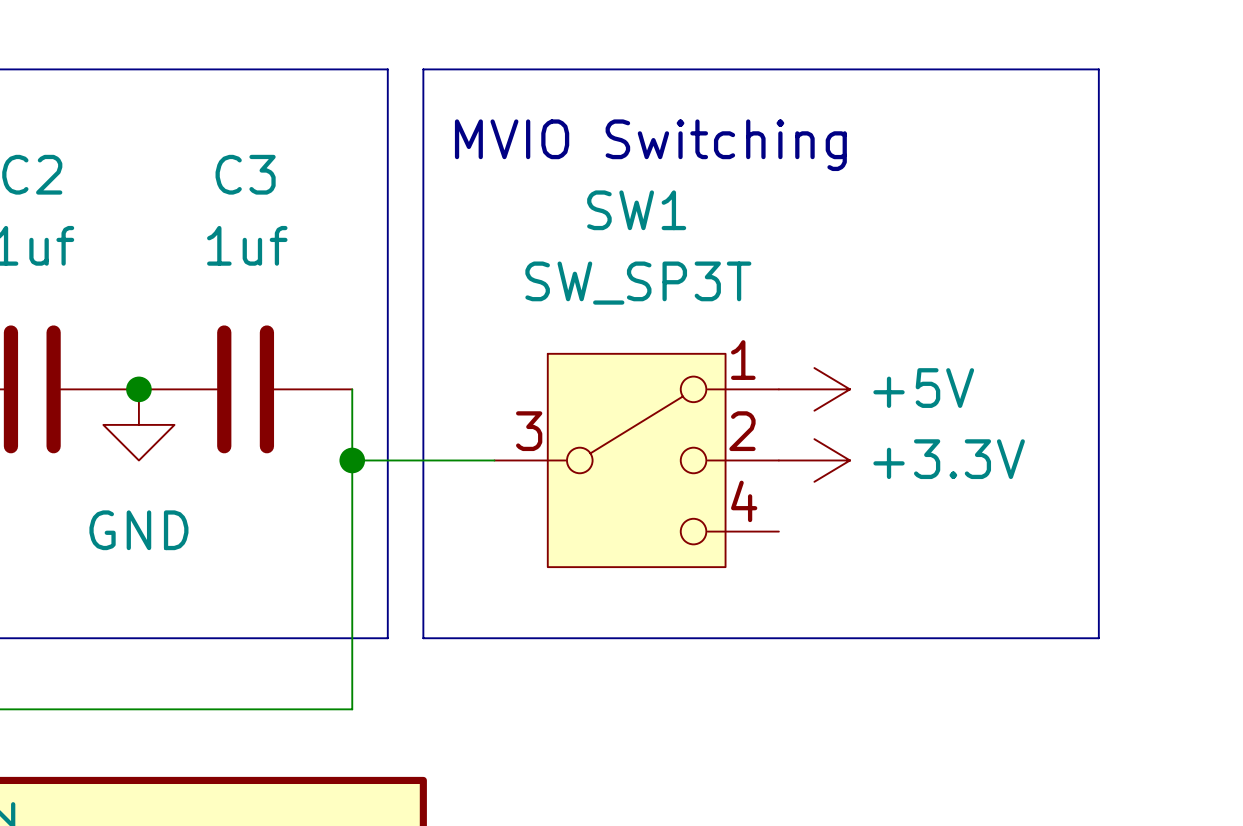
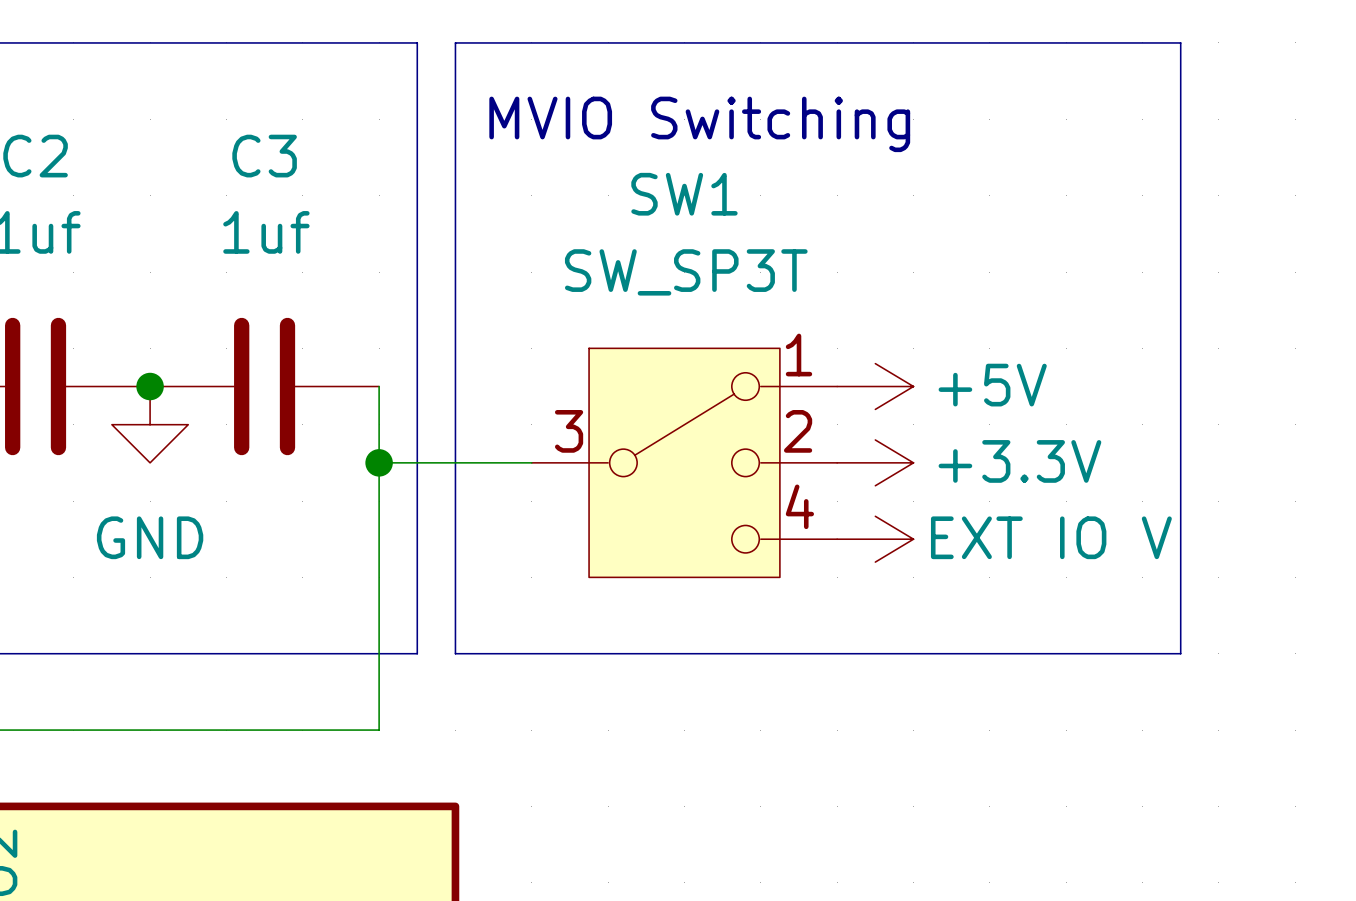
power symbol: none -> EXT IO V (875, 539)

